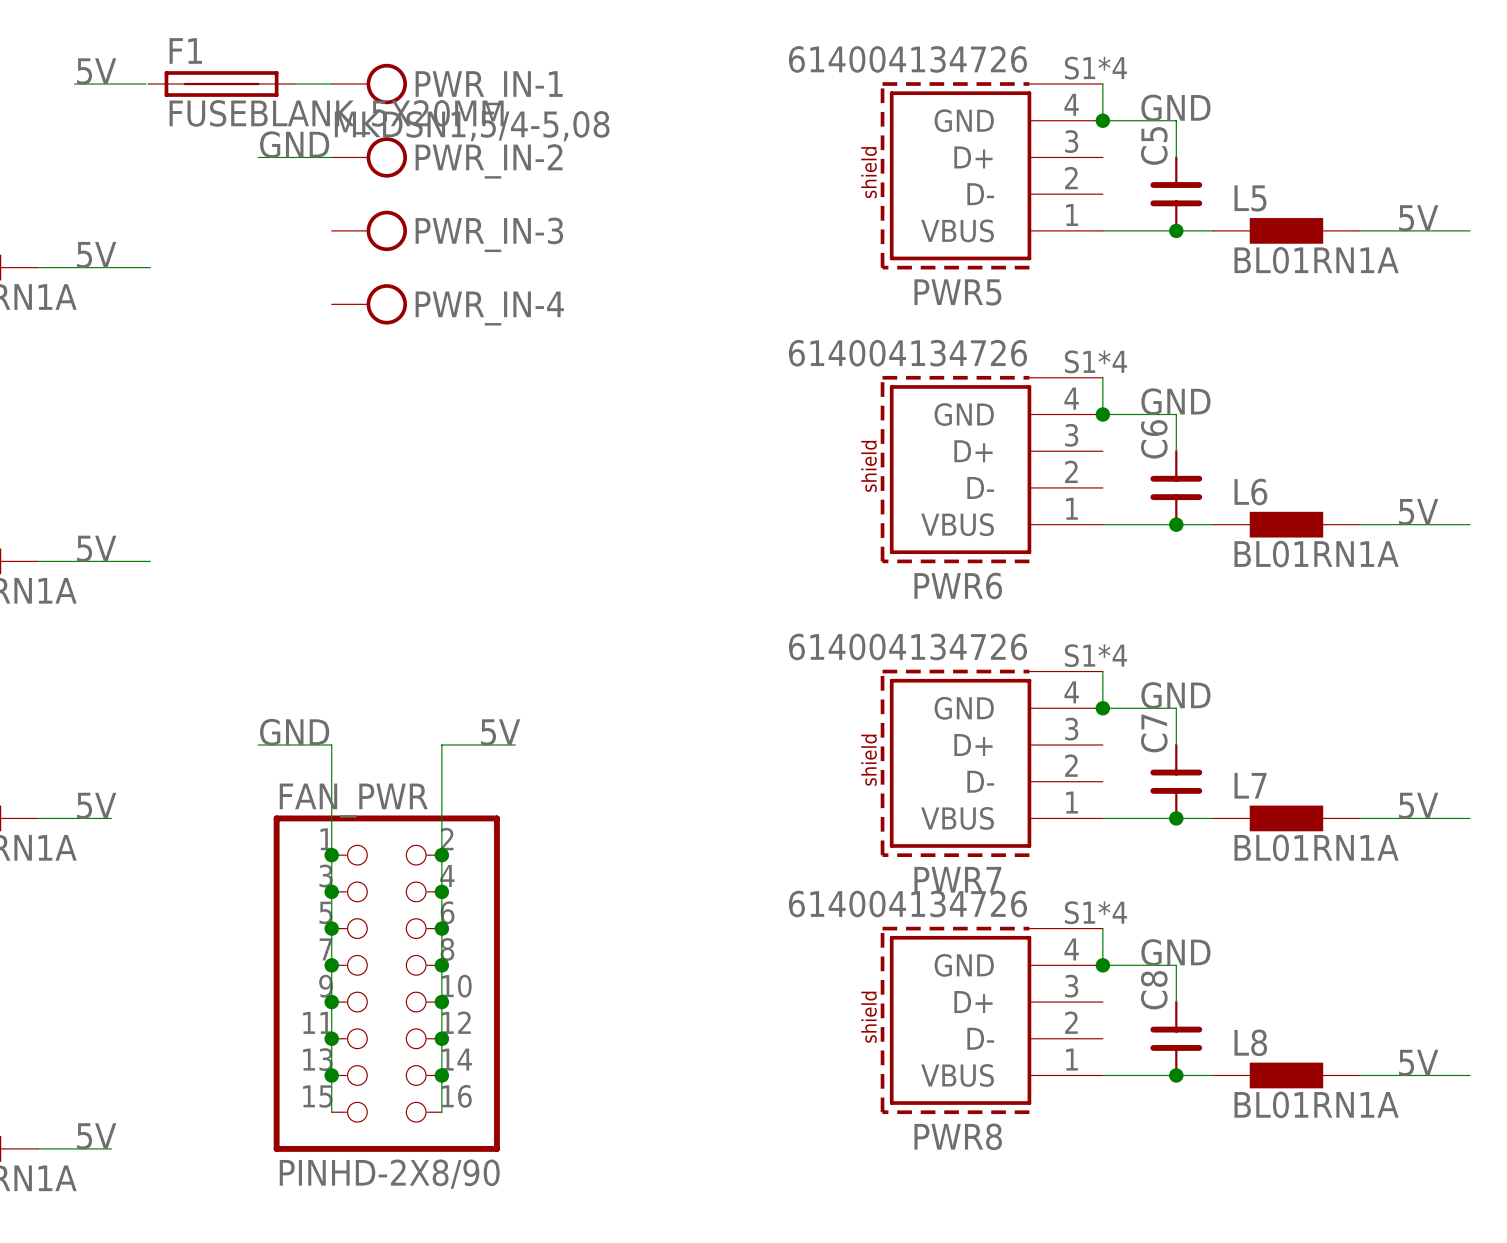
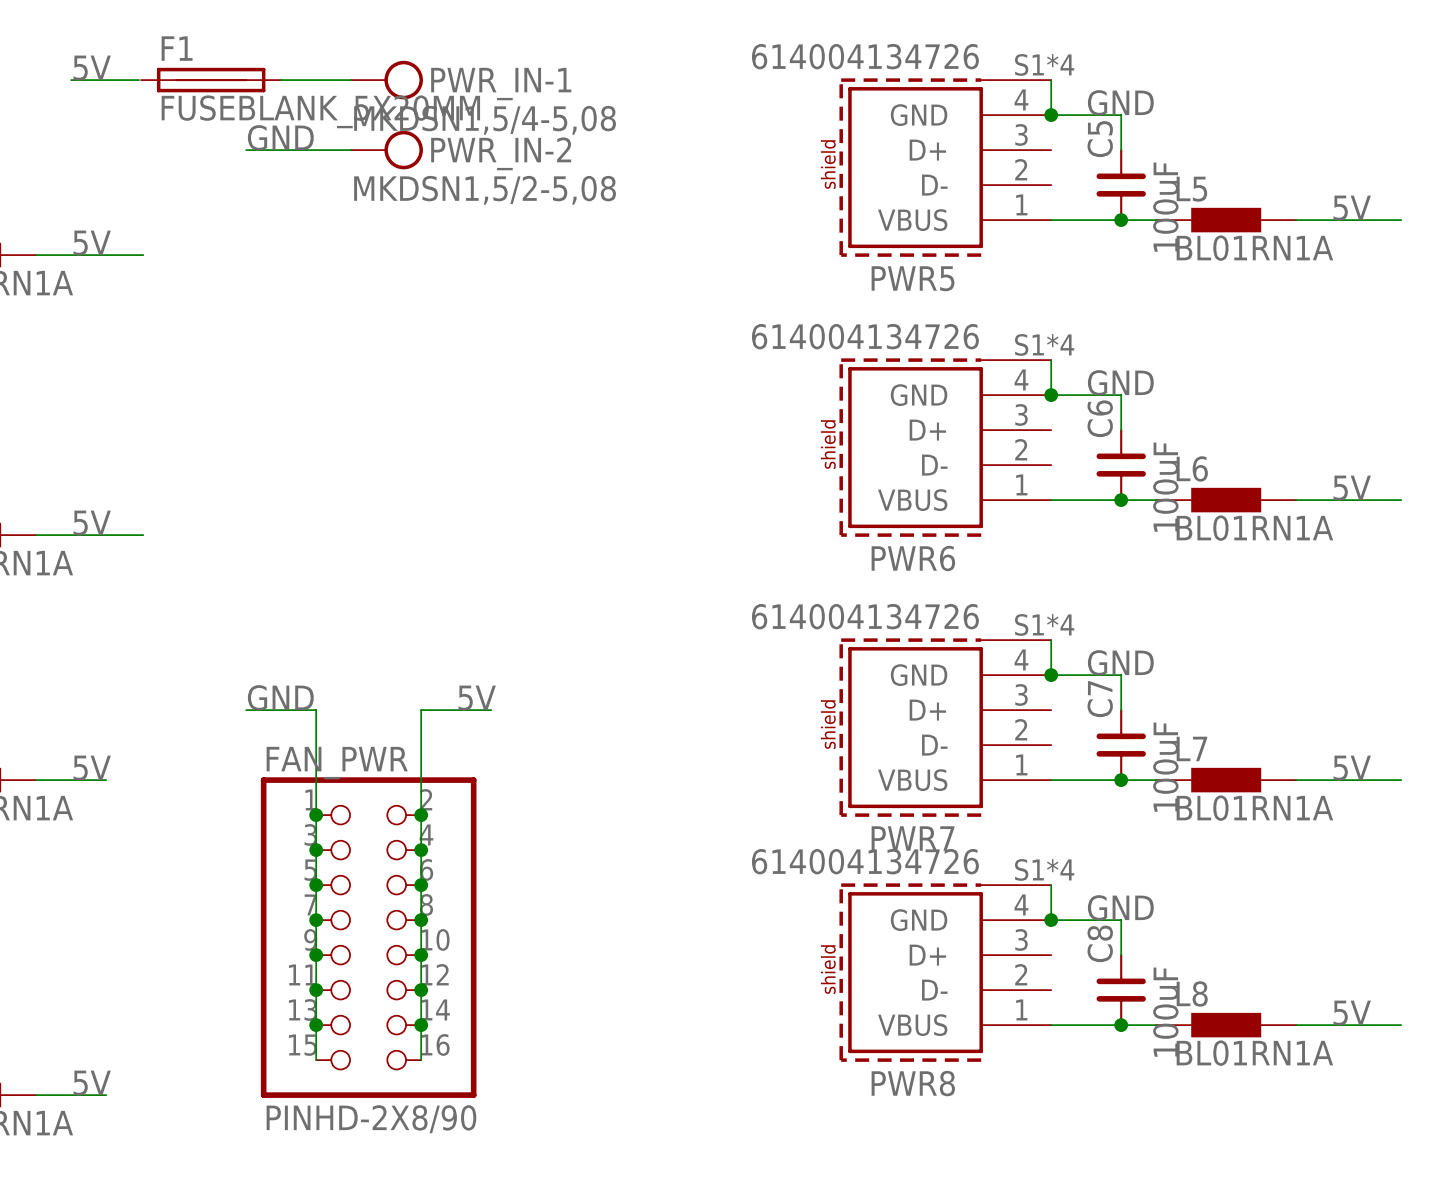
PWR_IN-1 position: (369, 84) -> (387, 80)
PWR_IN-2 position: (369, 157) -> (387, 150)
PWR_IN-2 value: none -> MKDSN1,5/2-5,08 (485, 190)
C5 value: none -> 100uF (1165, 207)
PWR_IN-3: (369, 230) -> none
PWR_IN-4: (369, 304) -> none
C6 value: none -> 100uF (1165, 487)
C7 value: none -> 100uF (1165, 767)
C8 value: none -> 100uF (1165, 1012)

